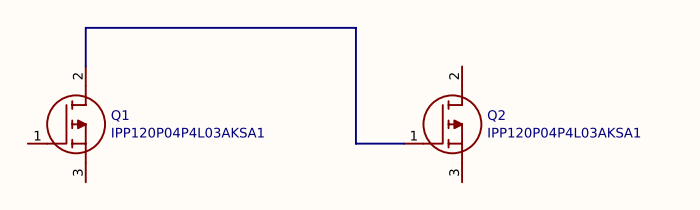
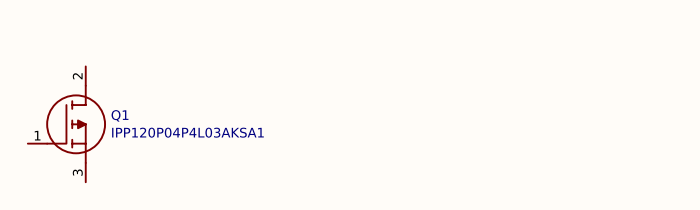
wire: (85, 66) (85, 27) (355, 27) (355, 143) (404, 143) -> none
Q2: IPP120P04P4L03AKSA1 (443, 124) -> none

